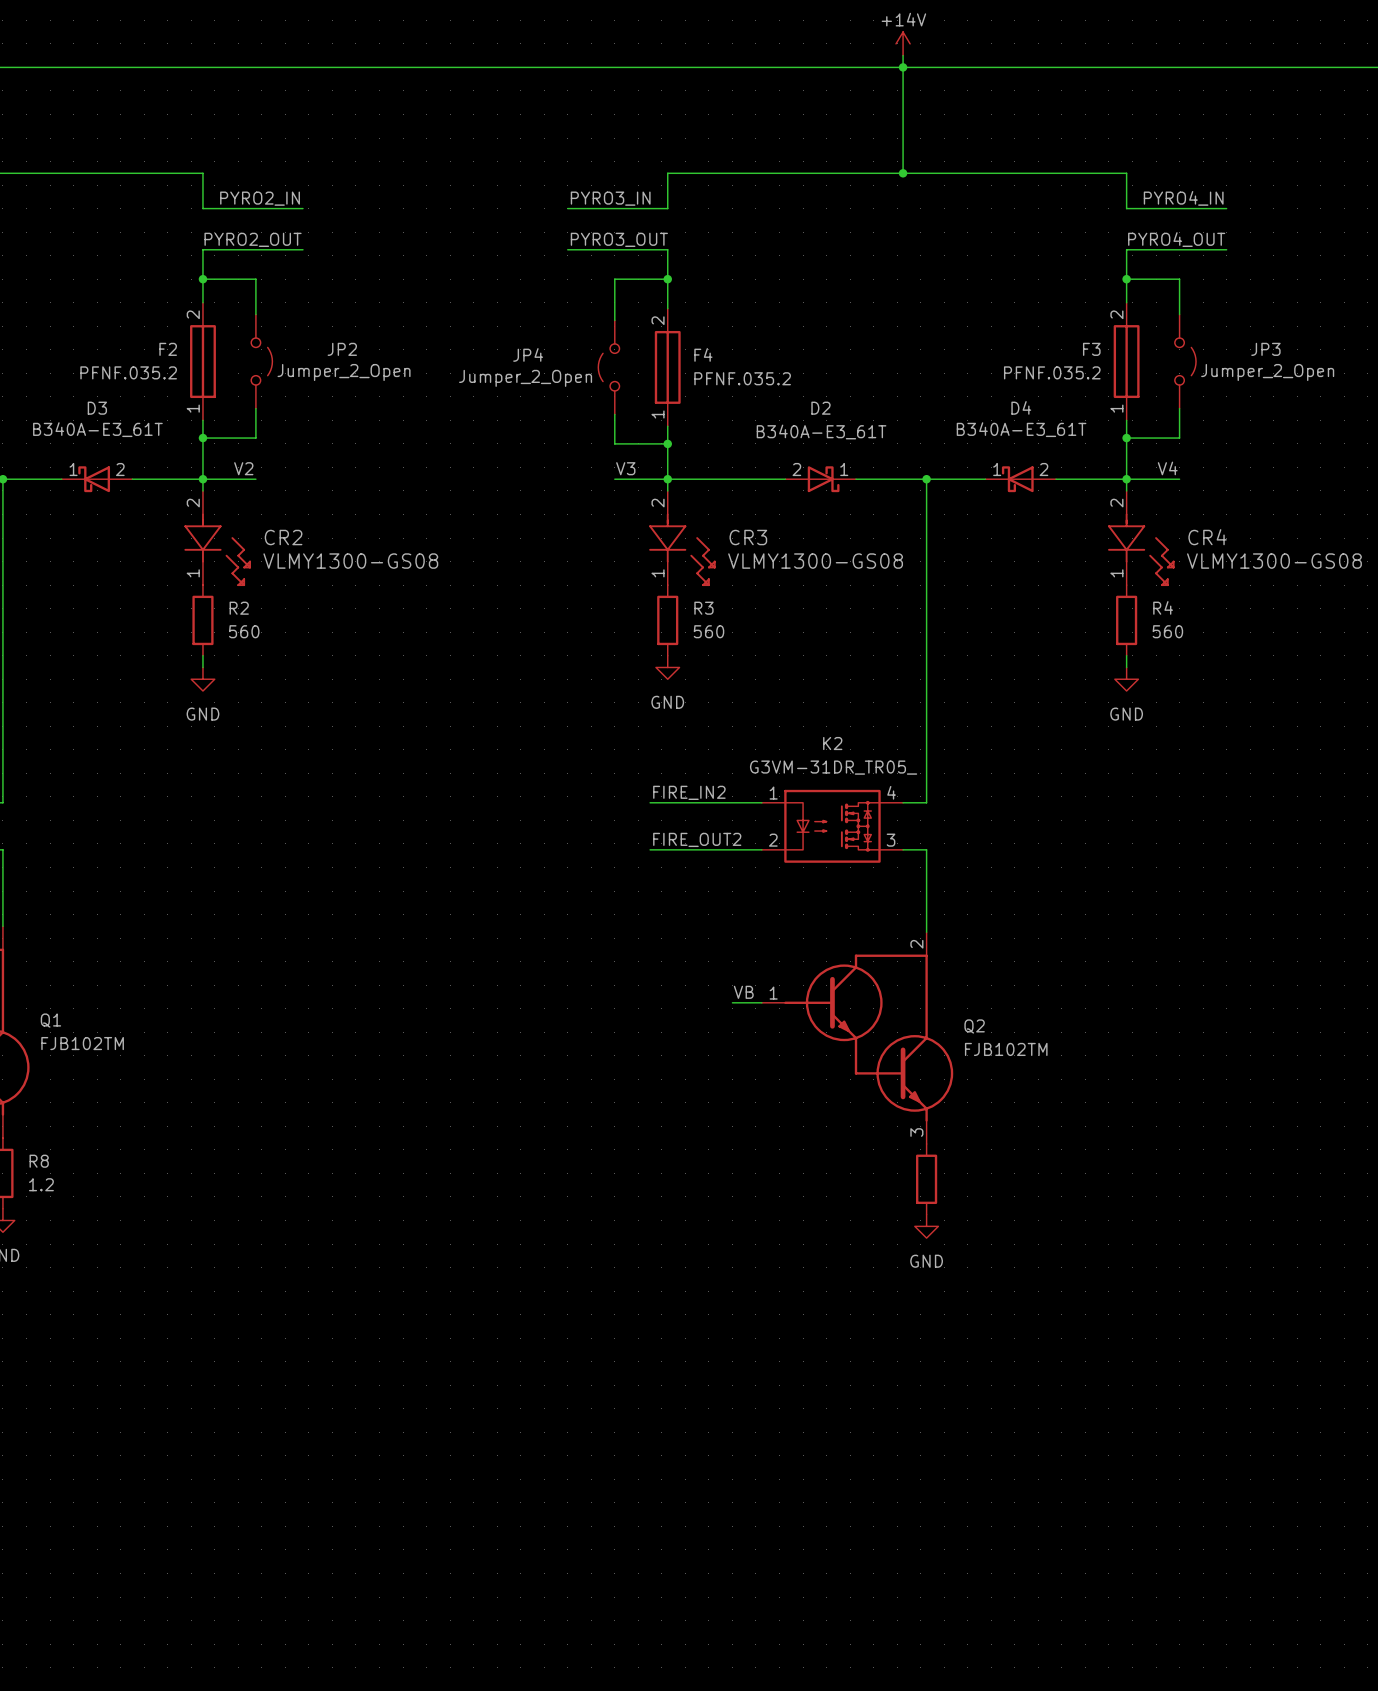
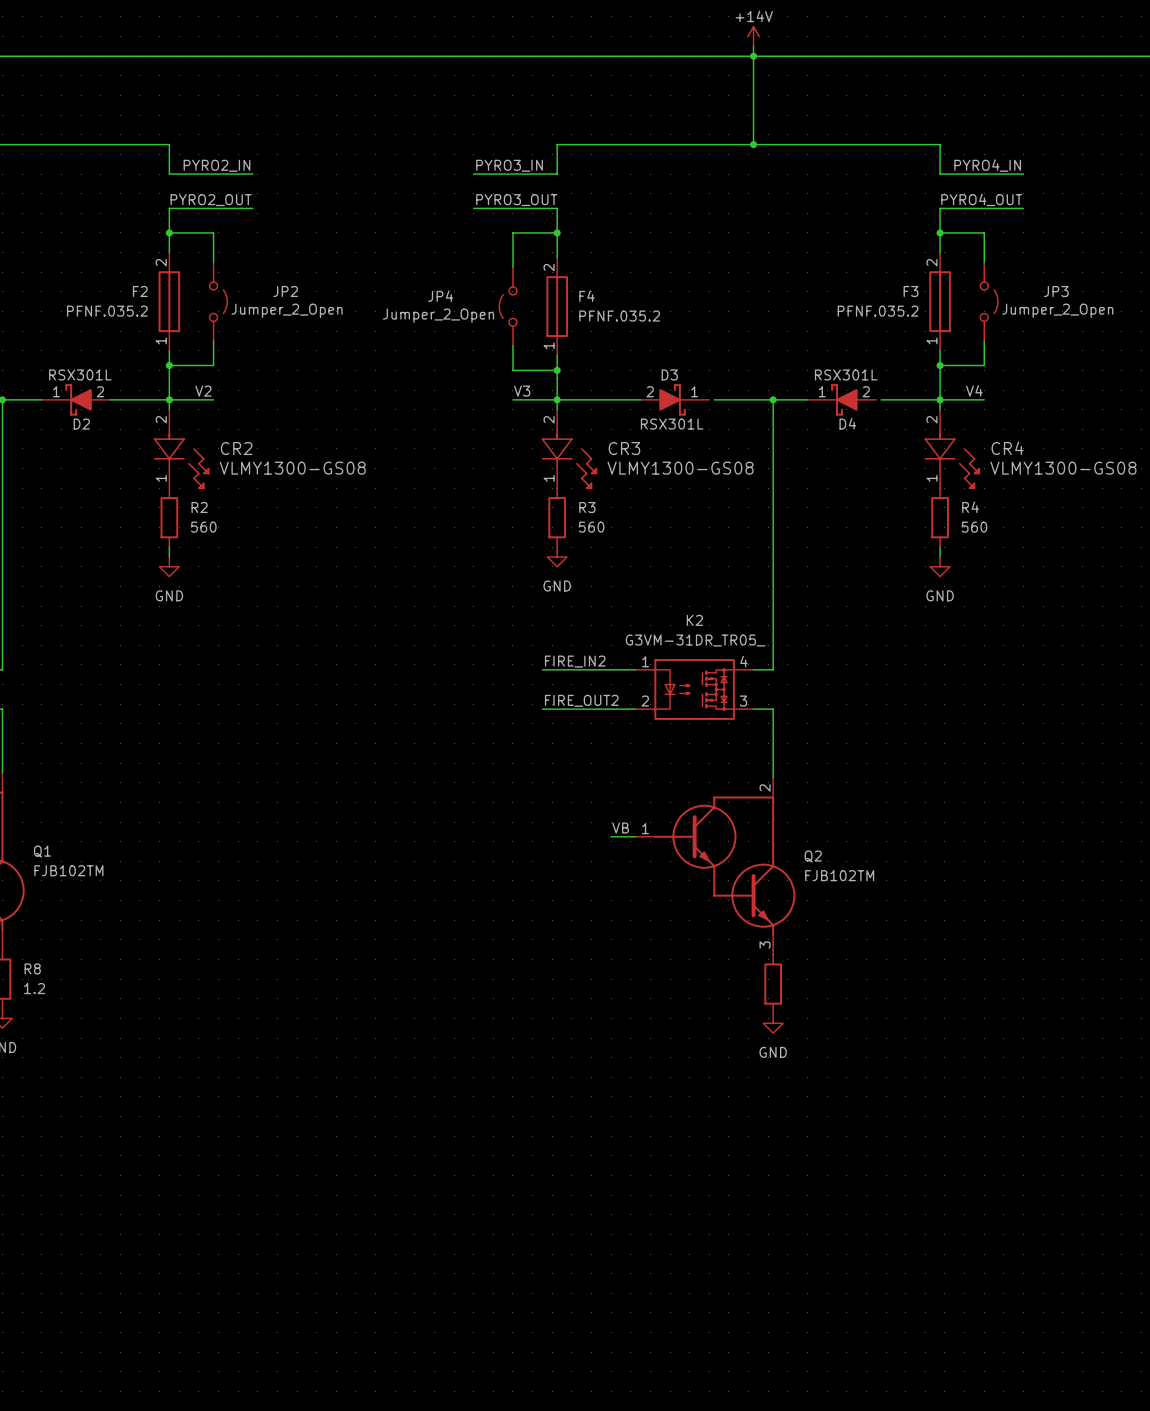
D4 name position: D4 (1021, 407) -> D4 (847, 423)
D3 name position: D3 (97, 408) -> D3 (669, 374)
D2 name position: D2 (820, 408) -> D2 (81, 424)
D3 value: B340A-E3_61T (97, 429) -> RSX301L (672, 424)
D4 value: B340A-E3_61T (1021, 429) -> RSX301L (846, 374)
D2 value: B340A-E3_61T (821, 431) -> RSX301L (80, 374)
D3 symbol: [61, 466, 133, 493] -> [640, 384, 710, 416]
D2 symbol: [785, 466, 857, 493] -> [41, 384, 111, 416]
D4 symbol: [985, 466, 1057, 493] -> [807, 384, 877, 416]

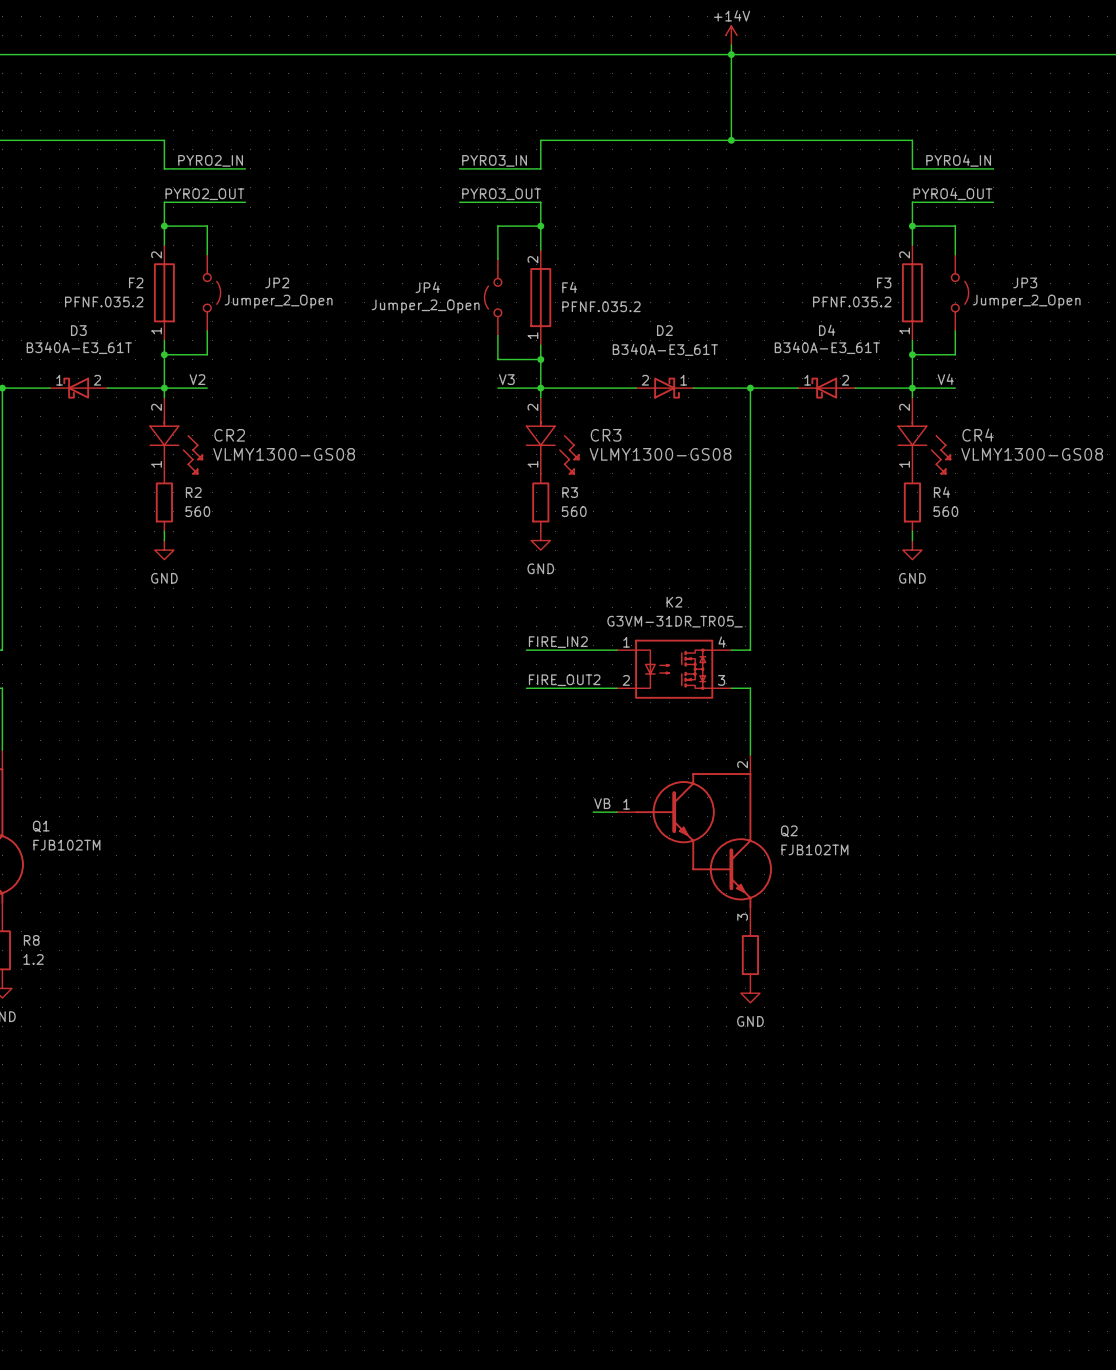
D2 value: RSX301L (80, 374) -> B340A-E3_61T (665, 349)
D3 name position: D3 (669, 374) -> D3 (78, 330)
D4 value: RSX301L (846, 374) -> B340A-E3_61T (827, 347)
D2 symbol: [41, 384, 111, 416] -> [636, 377, 694, 399]
D3 symbol: [640, 384, 710, 416] -> [50, 377, 108, 399]
D4 symbol: [807, 384, 877, 416] -> [798, 377, 856, 399]
D4 name position: D4 (847, 423) -> D4 (827, 330)
D2 name position: D2 (81, 424) -> D2 (664, 330)
D3 value: RSX301L (672, 424) -> B340A-E3_61T (79, 347)

